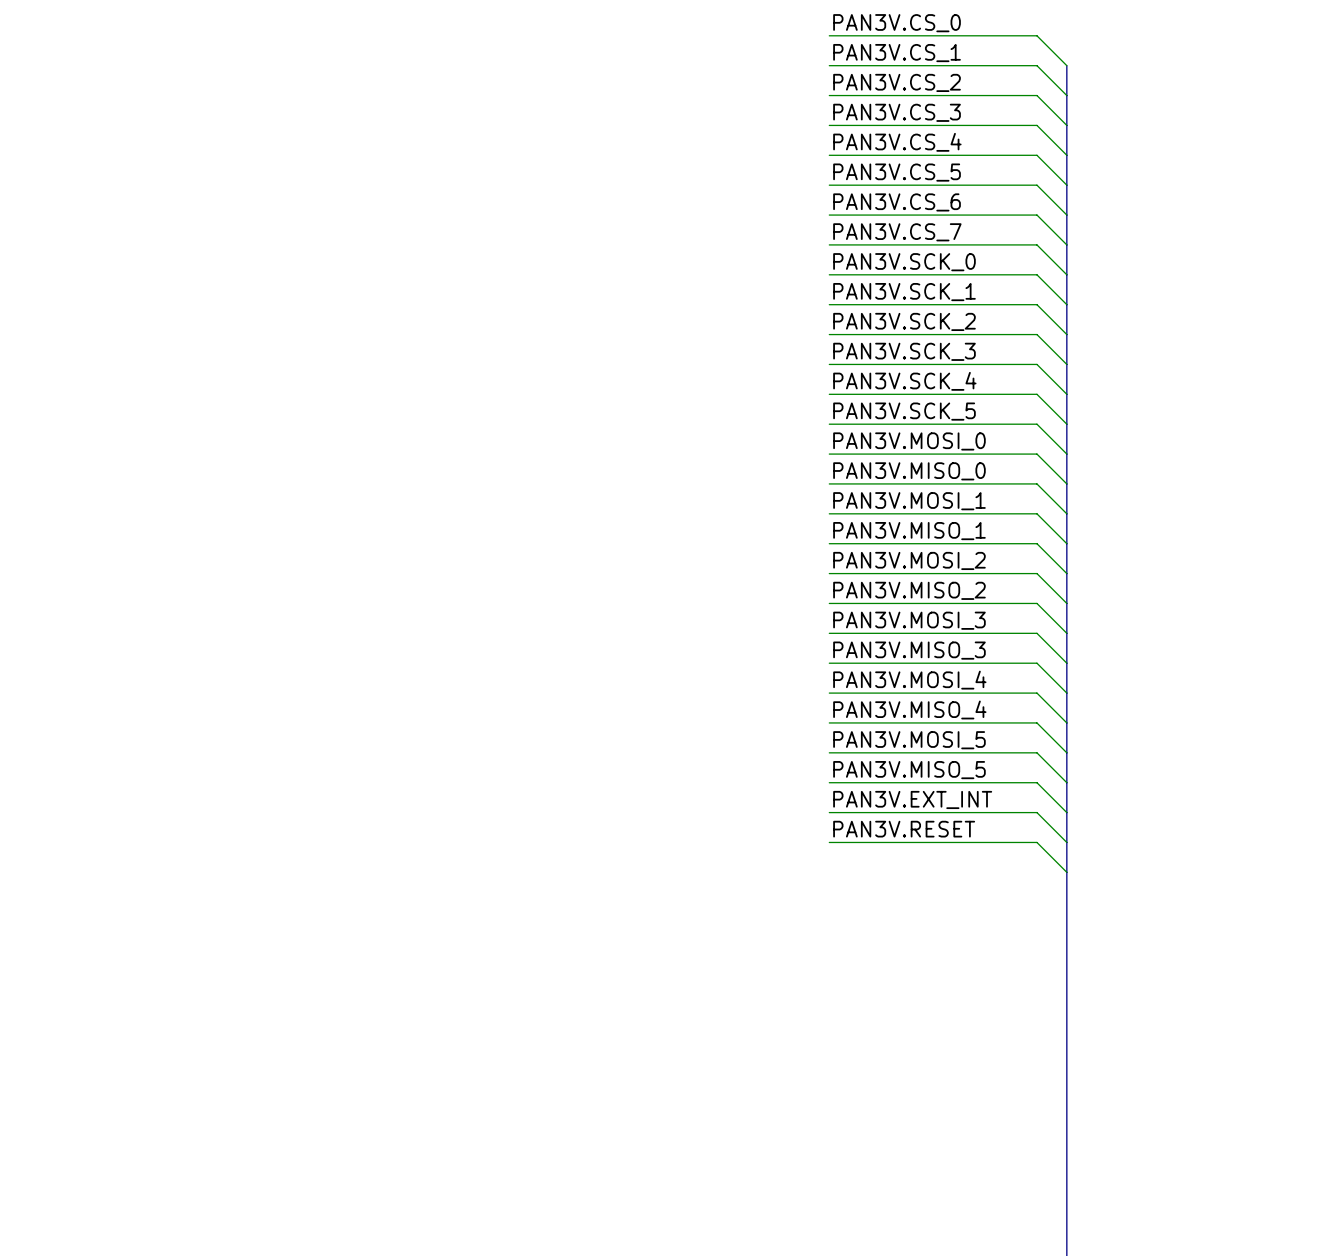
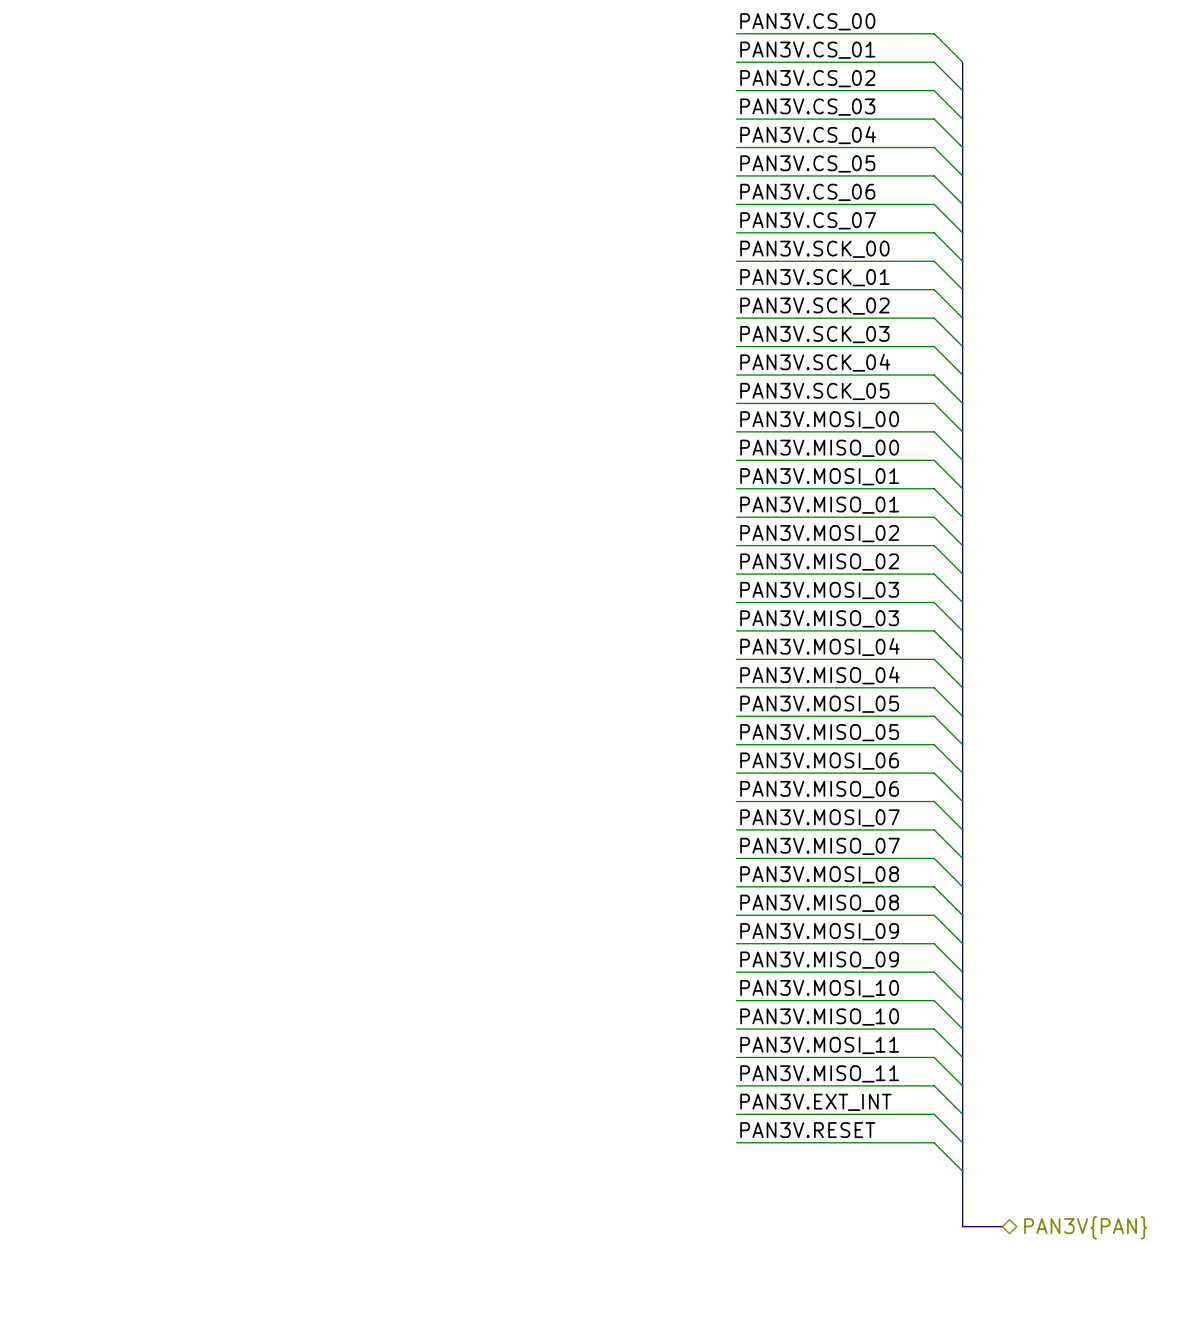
label: PAN3V.CS_0 (897, 23) -> PAN3V.CS_00 (807, 21)
label: PAN3V.CS_1 (897, 53) -> PAN3V.CS_01 (807, 50)
label: PAN3V.CS_2 (897, 82) -> PAN3V.CS_02 (807, 78)
label: PAN3V.CS_3 (897, 112) -> PAN3V.CS_03 (807, 107)
label: PAN3V.CS_4 (897, 142) -> PAN3V.CS_04 (808, 135)
label: PAN3V.CS_5 (897, 172) -> PAN3V.CS_05 (807, 163)
label: PAN3V.CS_6 (897, 202) -> PAN3V.CS_06 (807, 192)
label: PAN3V.CS_7 (897, 232) -> PAN3V.CS_07 (808, 220)
label: PAN3V.SCK_0 (904, 262) -> PAN3V.SCK_00 (814, 249)
label: PAN3V.SCK_1 (904, 292) -> PAN3V.SCK_01 (814, 277)
label: PAN3V.SCK_2 (904, 321) -> PAN3V.SCK_02 (814, 306)
label: PAN3V.SCK_3 (904, 351) -> PAN3V.SCK_03 (814, 334)
label: PAN3V.SCK_4 (904, 381) -> PAN3V.SCK_04 (815, 362)
label: PAN3V.SCK_5 (904, 411) -> PAN3V.SCK_05 (814, 391)
label: PAN3V.MOSI_0 (909, 441) -> PAN3V.MOSI_00 (819, 419)
label: PAN3V.MISO_0 (909, 471) -> PAN3V.MISO_00 (819, 448)
label: PAN3V.MOSI_1 (909, 501) -> PAN3V.MOSI_01 (819, 476)
label: PAN3V.MISO_1 (909, 531) -> PAN3V.MISO_01 (819, 505)
label: PAN3V.MOSI_2 (909, 560) -> PAN3V.MOSI_02 (819, 533)
label: PAN3V.MISO_2 (909, 590) -> PAN3V.MISO_02 (819, 562)
label: PAN3V.MOSI_3 (909, 620) -> PAN3V.MOSI_03 (819, 590)
label: PAN3V.MISO_3 (909, 650) -> PAN3V.MISO_03 (819, 618)
label: PAN3V.MOSI_4 (909, 680) -> PAN3V.MOSI_04 (819, 647)
label: PAN3V.MISO_4 (909, 709) -> PAN3V.MISO_04 (819, 675)
label: PAN3V.MOSI_5 (909, 740) -> PAN3V.MOSI_05 (819, 704)
label: PAN3V.MISO_5 (909, 770) -> PAN3V.MISO_05 (819, 732)
label: PAN3V.EXT_INT (912, 799) -> PAN3V.MOSI_06 (819, 761)
label: PAN3V.RESET (904, 829) -> PAN3V.MISO_06 (819, 789)
label: none -> PAN3V.MOSI_07 (819, 817)
wire: none -> (736, 829) (934, 829) (962, 858)
label: none -> PAN3V.MISO_07 (819, 846)
wire: none -> (736, 858) (934, 858) (962, 886)
label: none -> PAN3V.MOSI_08 (819, 874)
wire: none -> (736, 886) (934, 886) (962, 915)
label: none -> PAN3V.MISO_08 (819, 903)
wire: none -> (736, 915) (934, 915) (962, 943)
label: none -> PAN3V.MOSI_09 (819, 931)
wire: none -> (736, 943) (934, 943) (962, 972)
label: none -> PAN3V.MISO_09 (819, 960)
wire: none -> (736, 972) (934, 972) (962, 1000)
label: none -> PAN3V.MOSI_10 (819, 988)
wire: none -> (736, 1000) (934, 1000) (962, 1029)
label: none -> PAN3V.MISO_10 (819, 1017)
wire: none -> (736, 1029) (934, 1029) (962, 1057)
label: none -> PAN3V.MOSI_11 (819, 1045)
wire: none -> (736, 1057) (934, 1057) (962, 1085)
label: none -> PAN3V.MISO_11 (819, 1073)
wire: none -> (736, 1085) (934, 1085) (962, 1114)
label: none -> PAN3V.EXT_INT (815, 1102)
wire: none -> (736, 1114) (934, 1114) (962, 1142)
label: none -> PAN3V.RESET (807, 1130)
wire: none -> (736, 1142) (934, 1142) (962, 1171)

